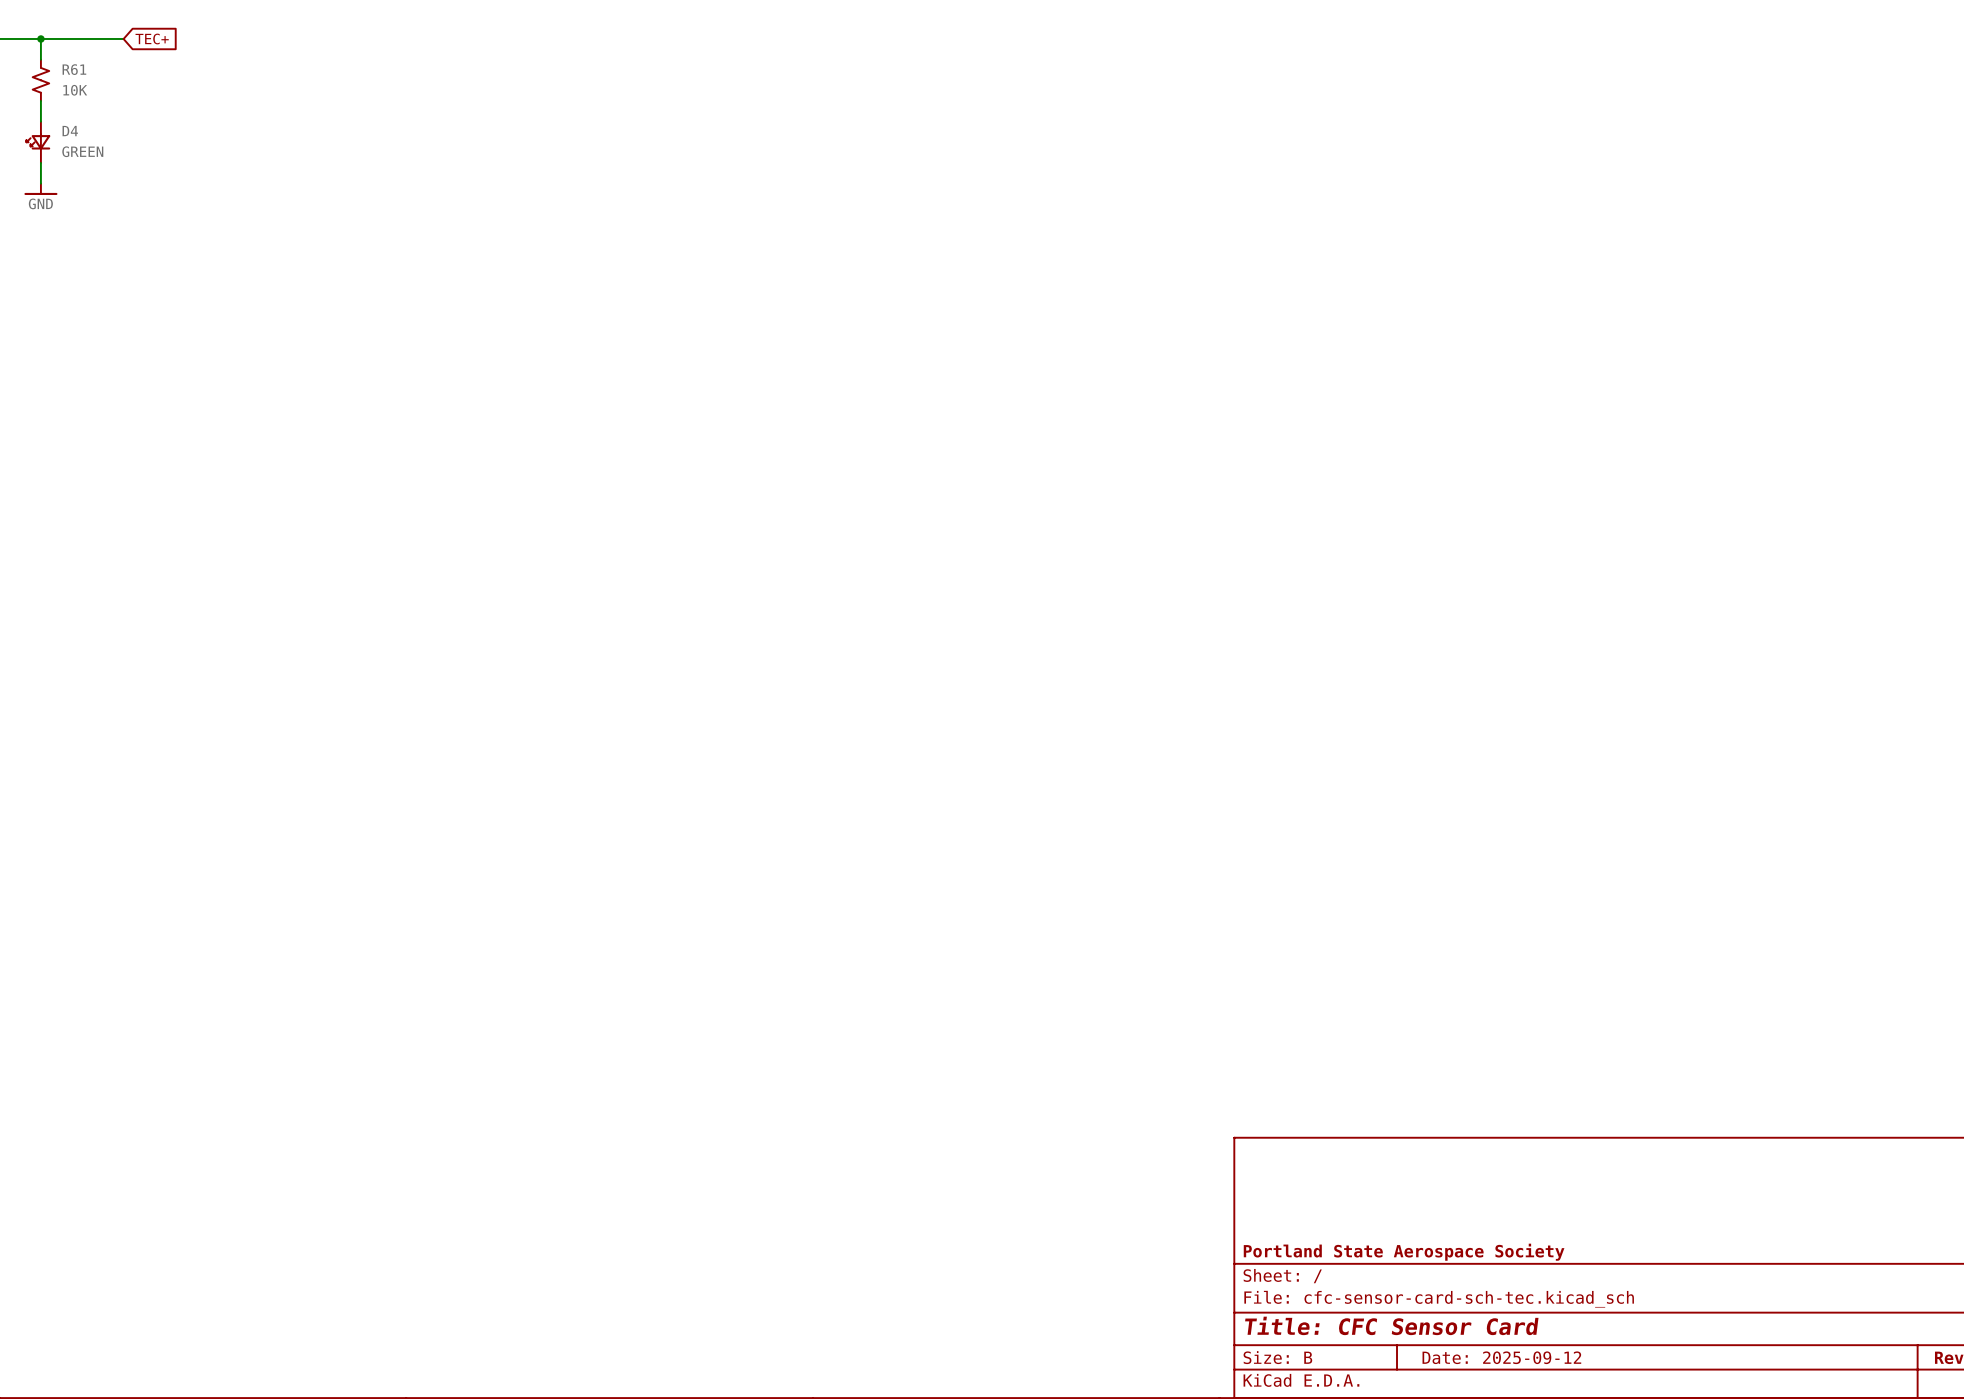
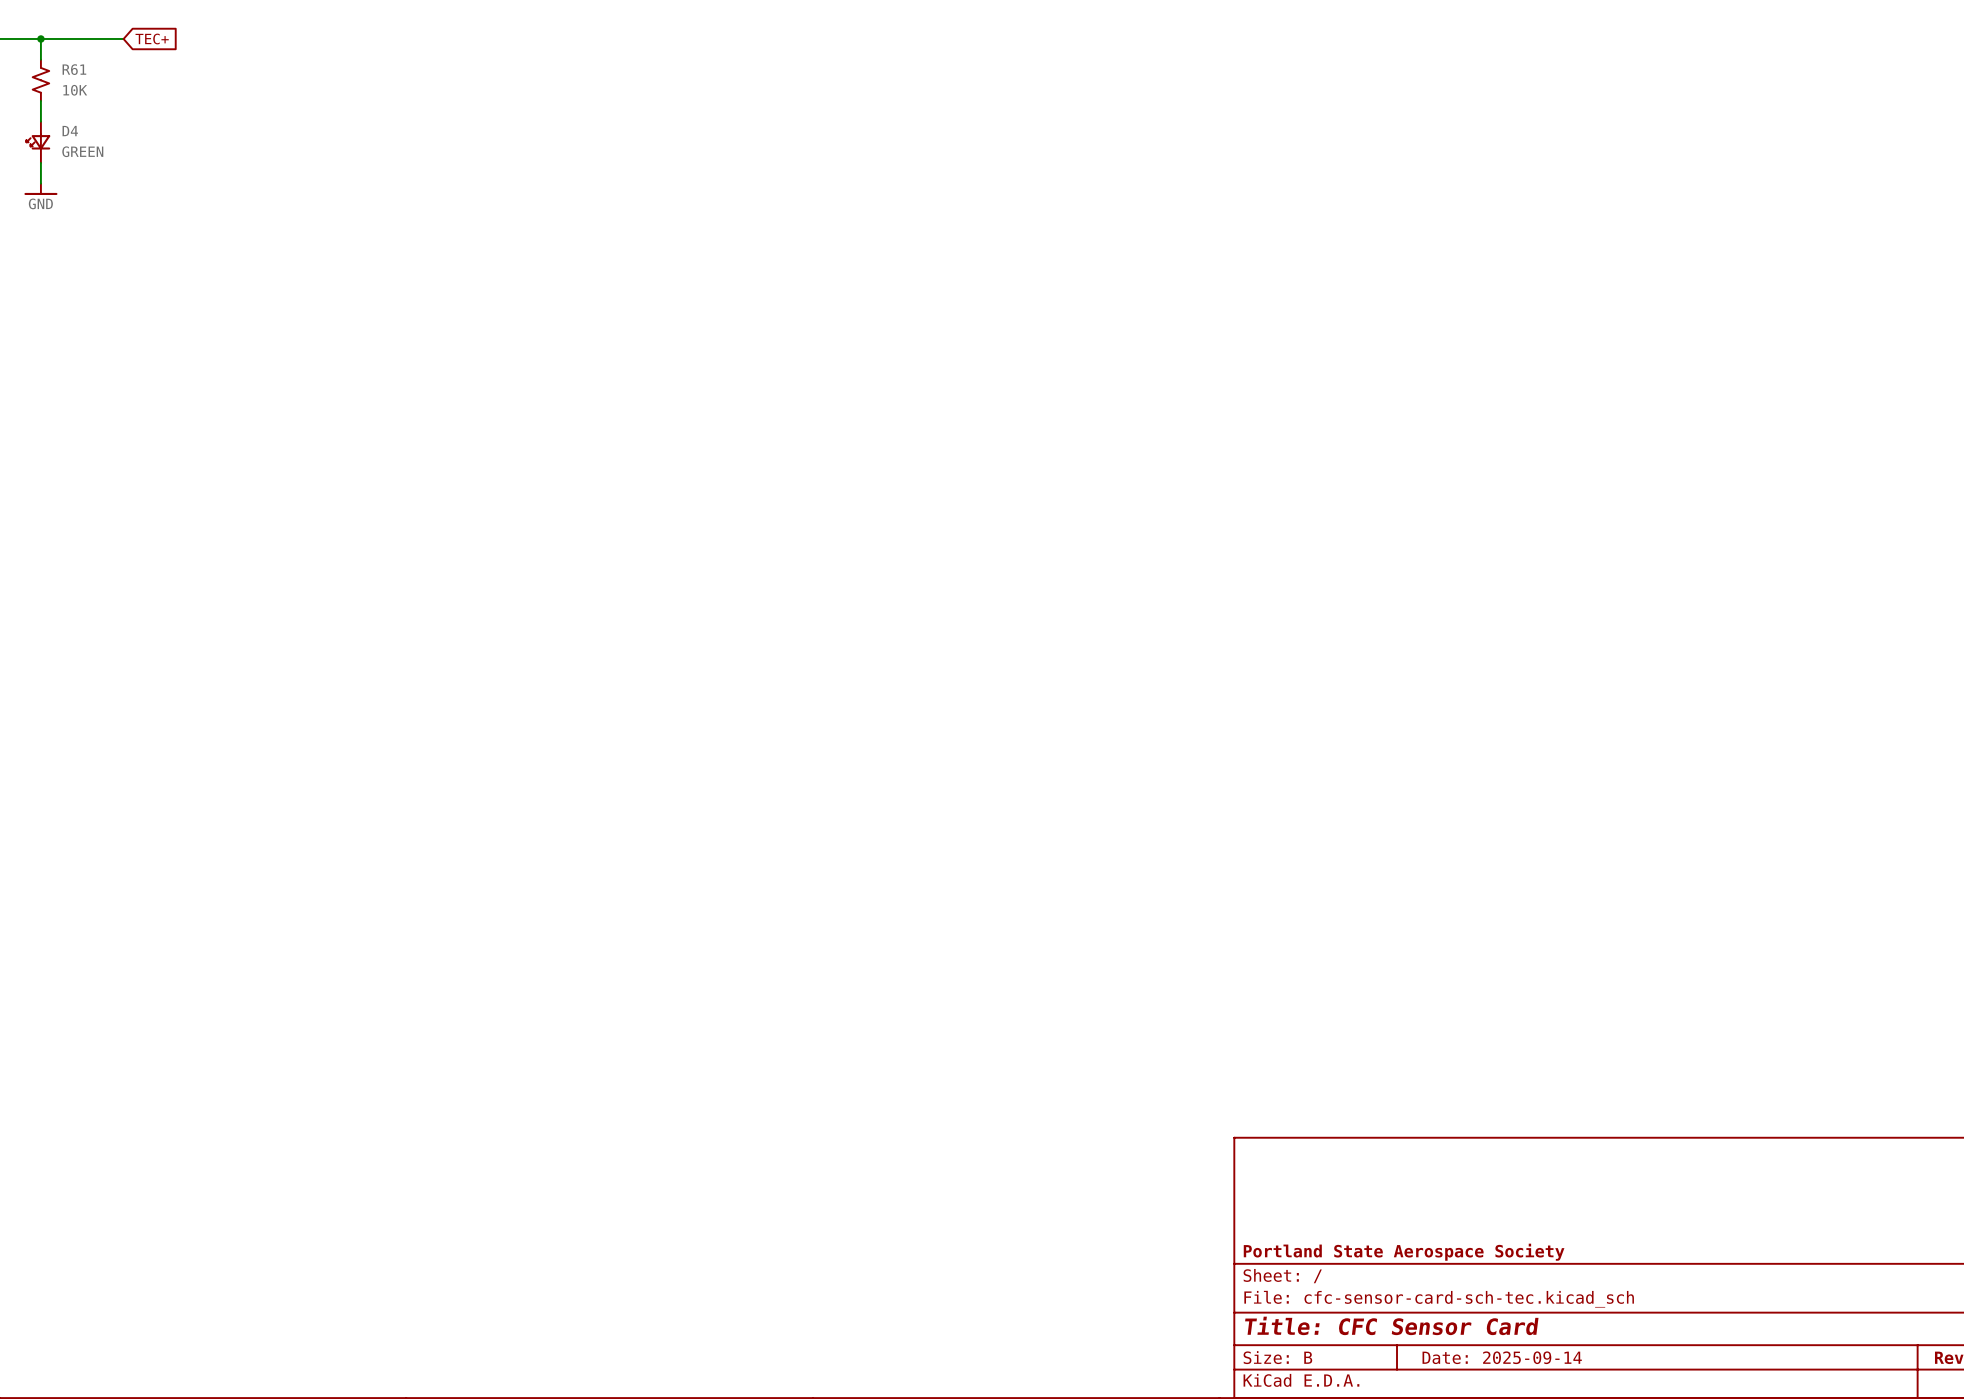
title block: Date: 2025-09-12 (1501, 1357) -> Date: 2025-09-14 (1502, 1357)

